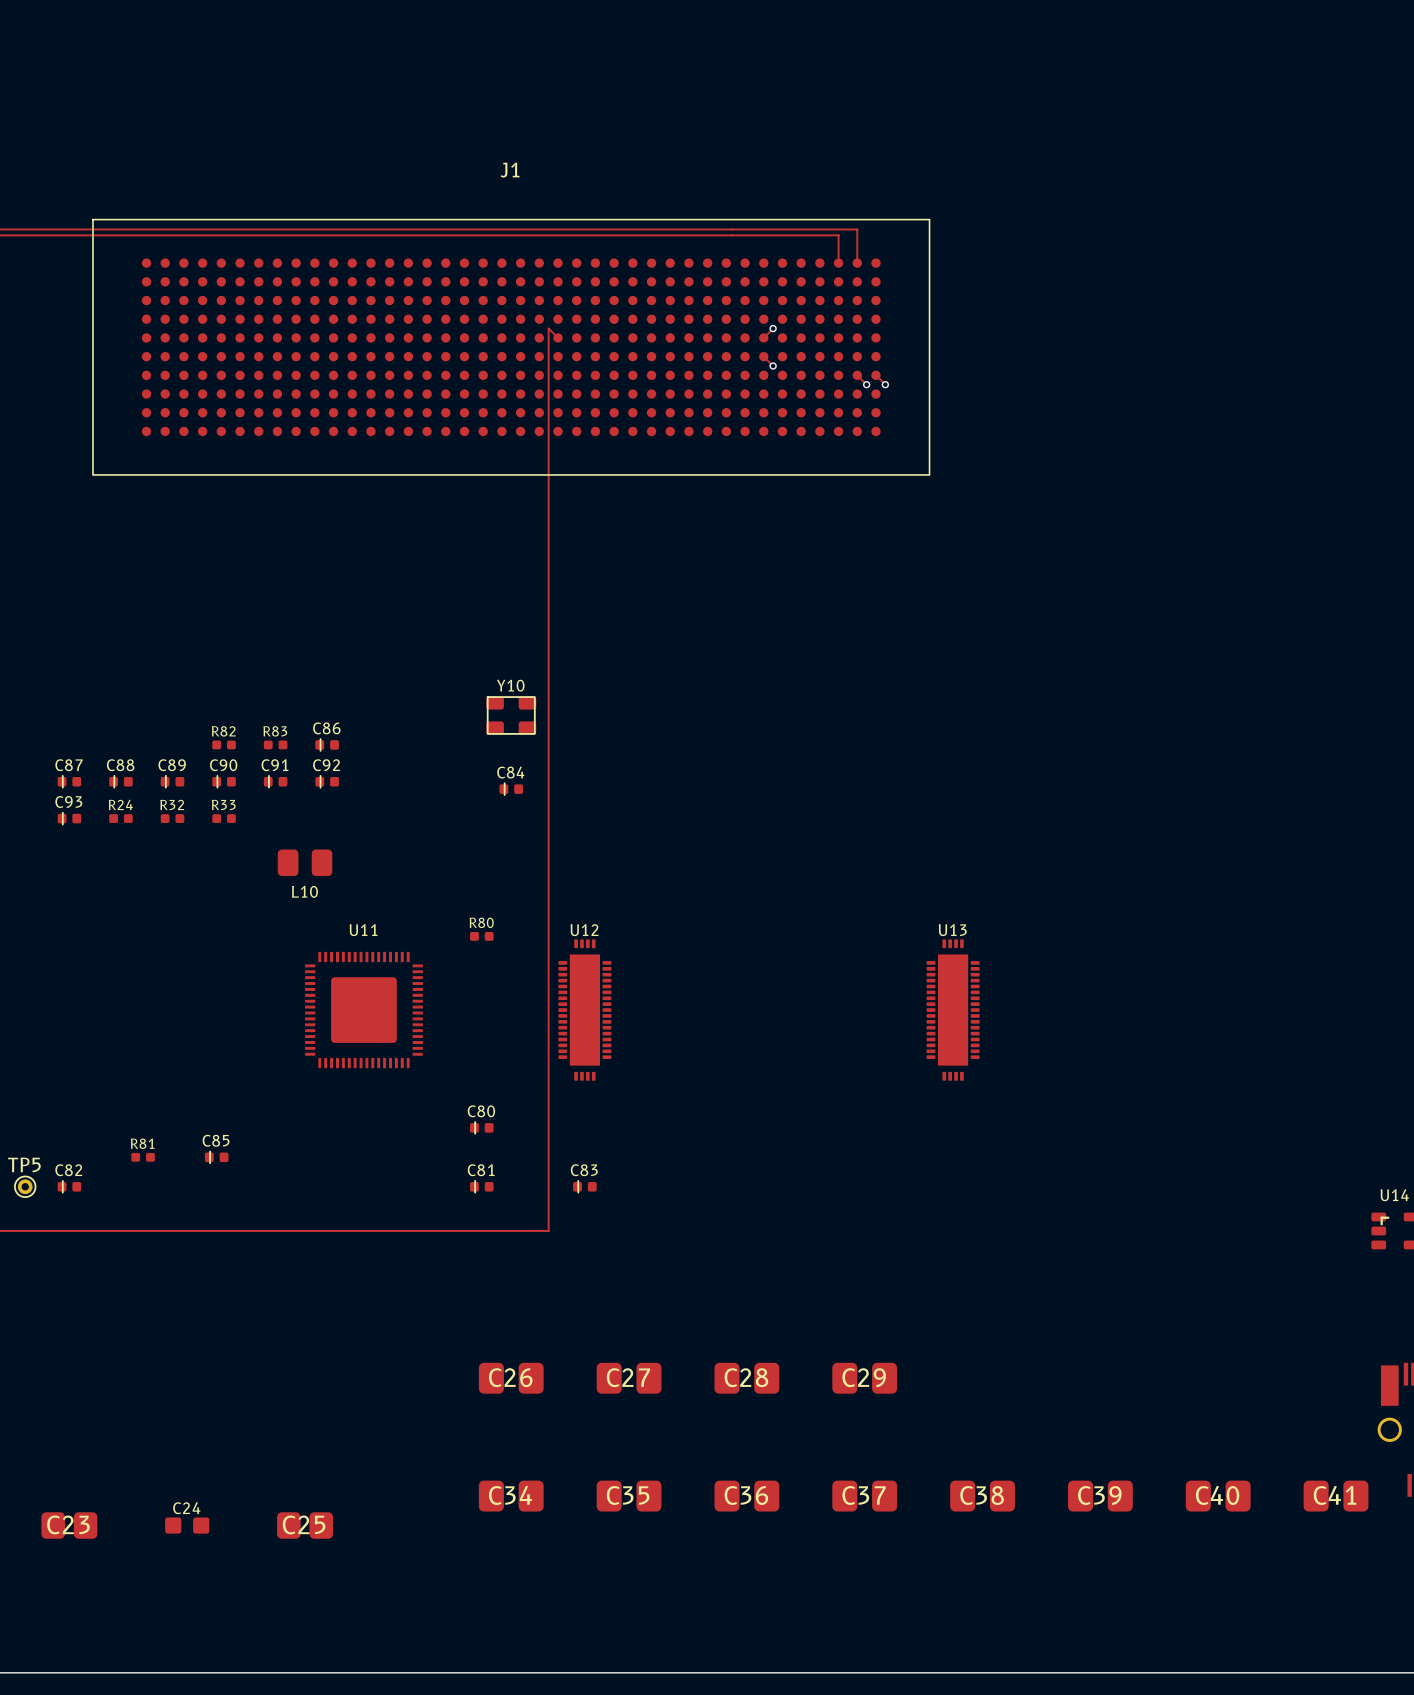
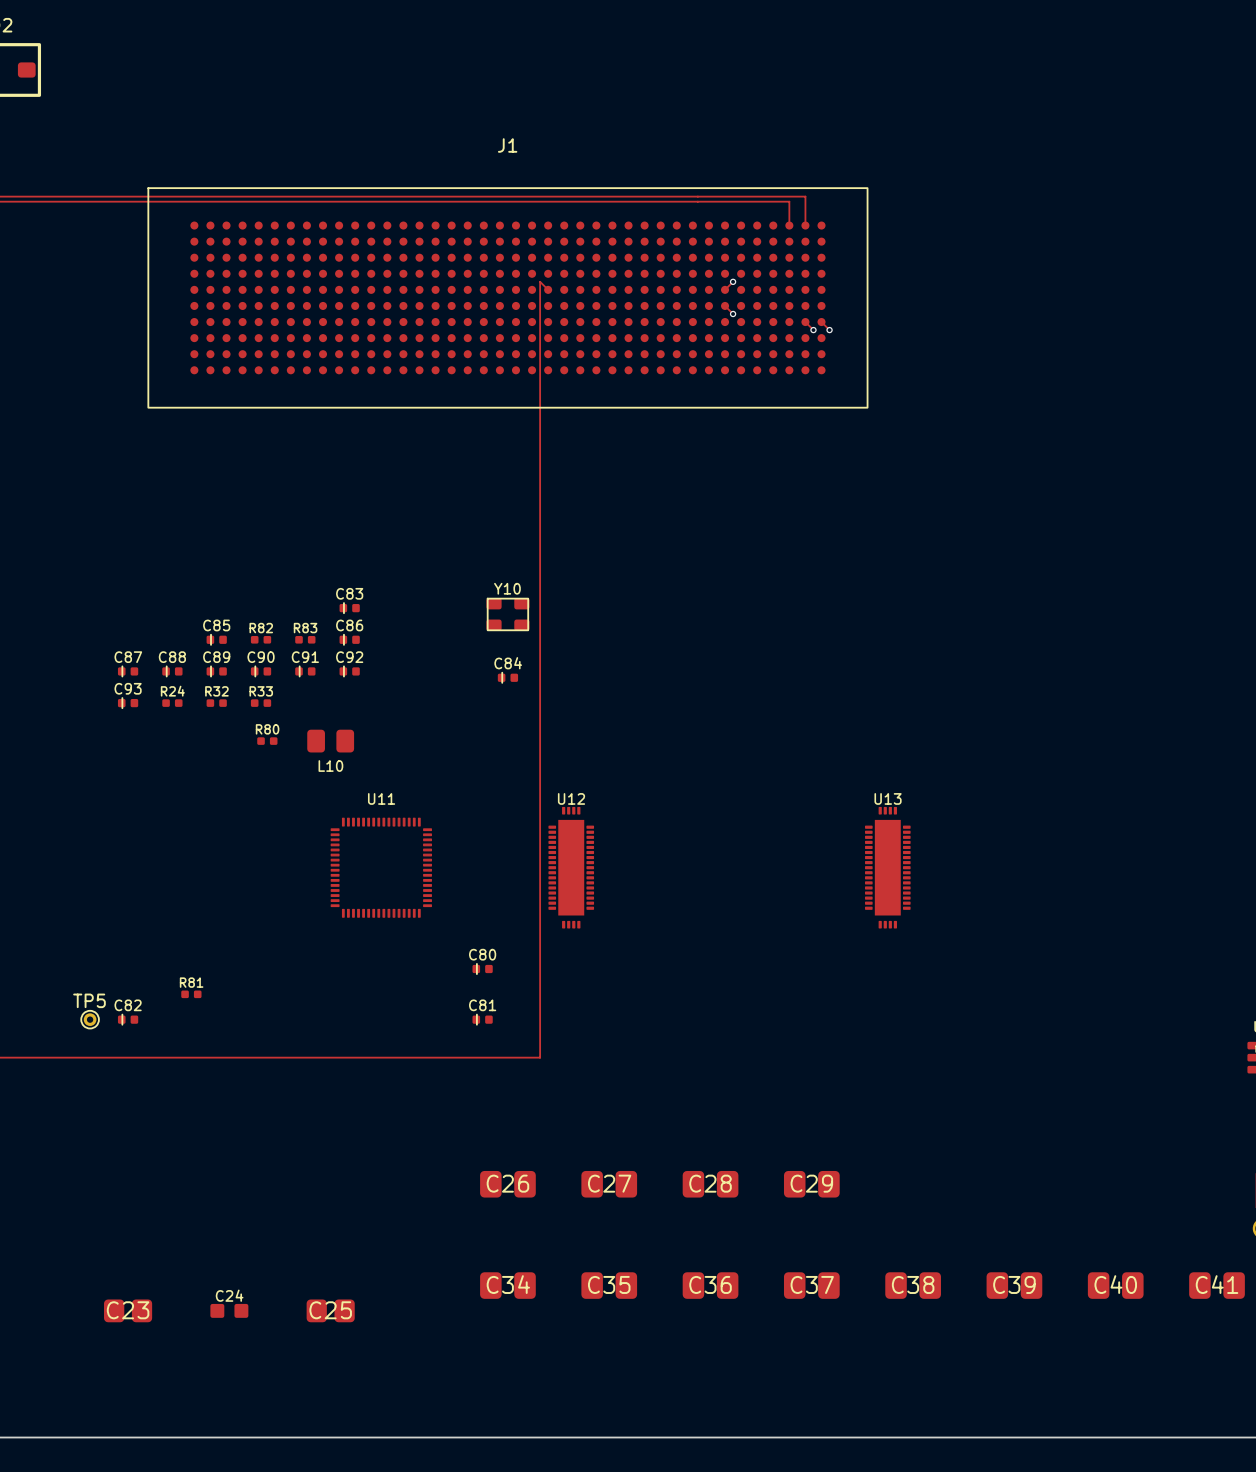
R80 position: (481, 936) -> (267, 741)
U11 footprint: [305, 951, 423, 1069] -> [330, 817, 432, 918]
C85 position: (216, 1157) -> (216, 639)
C83 position: (584, 1186) -> (349, 608)

